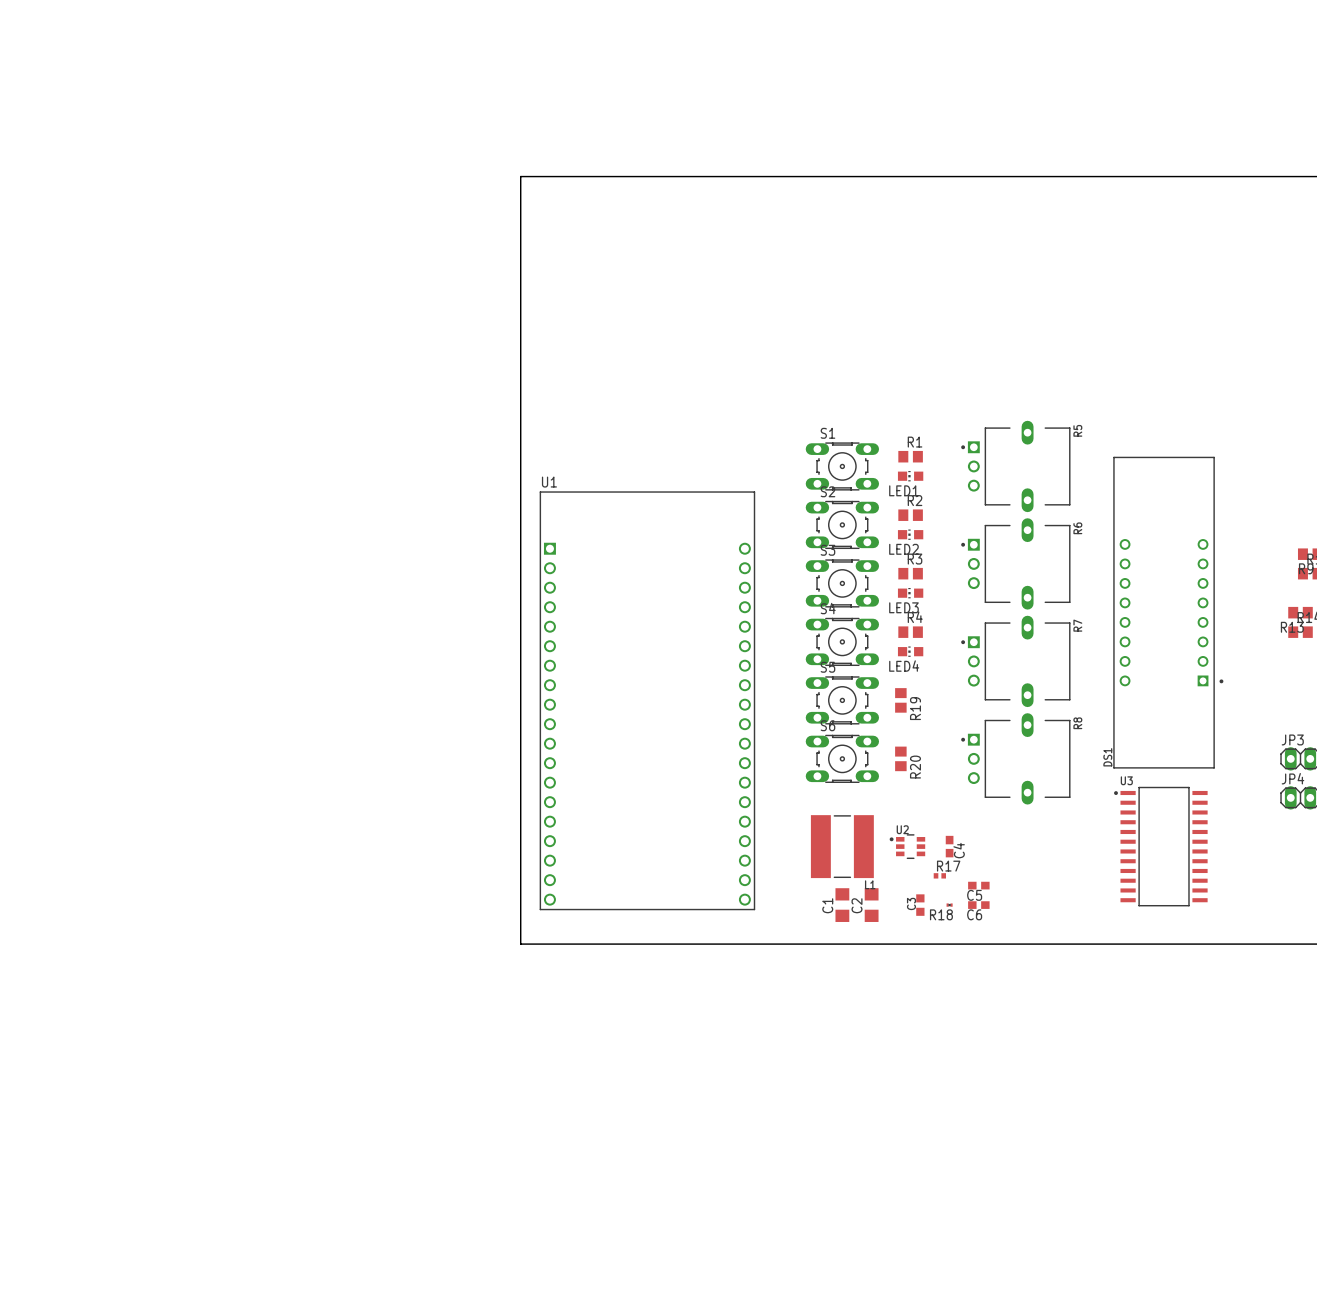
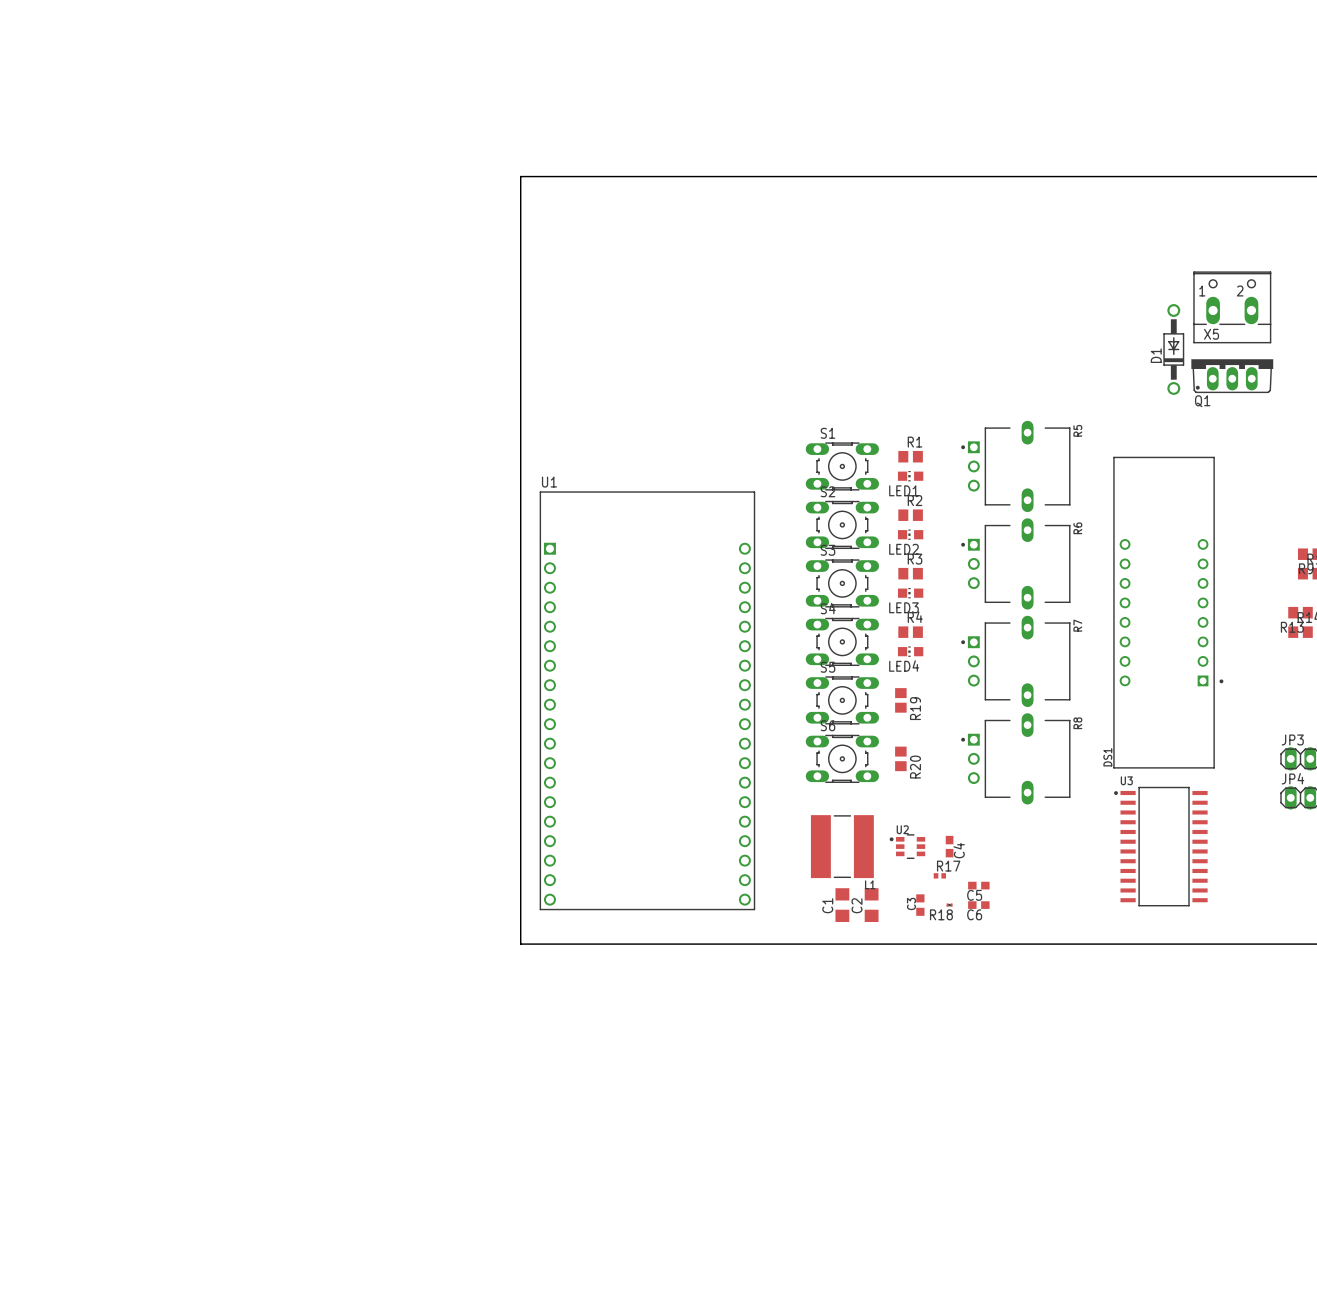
X5: none -> (1232, 307)
D1: none -> (1173, 349)
Q1: none -> (1232, 376)

